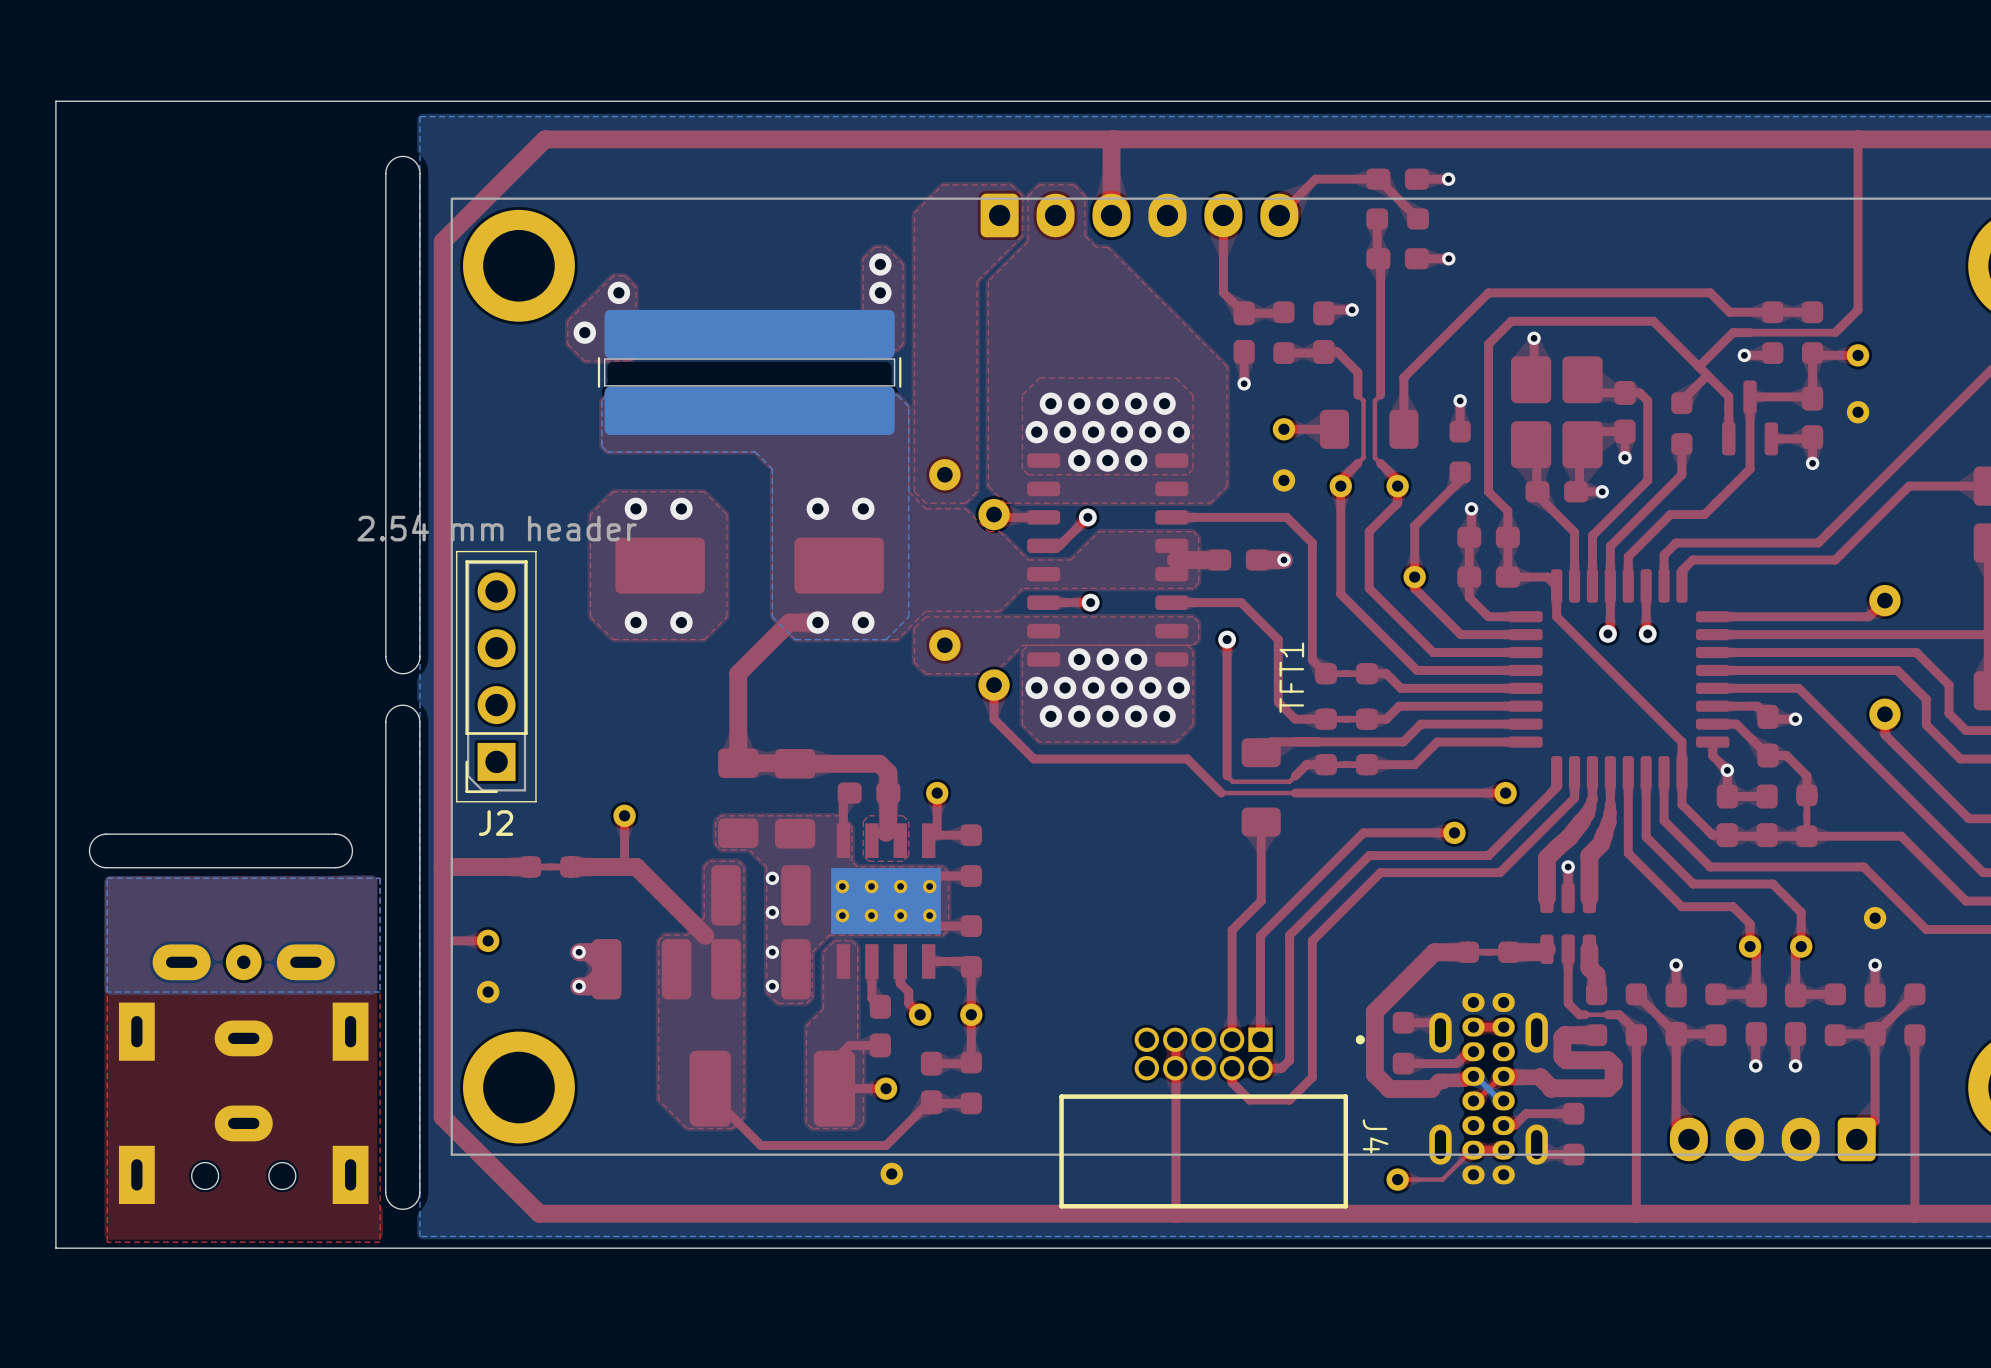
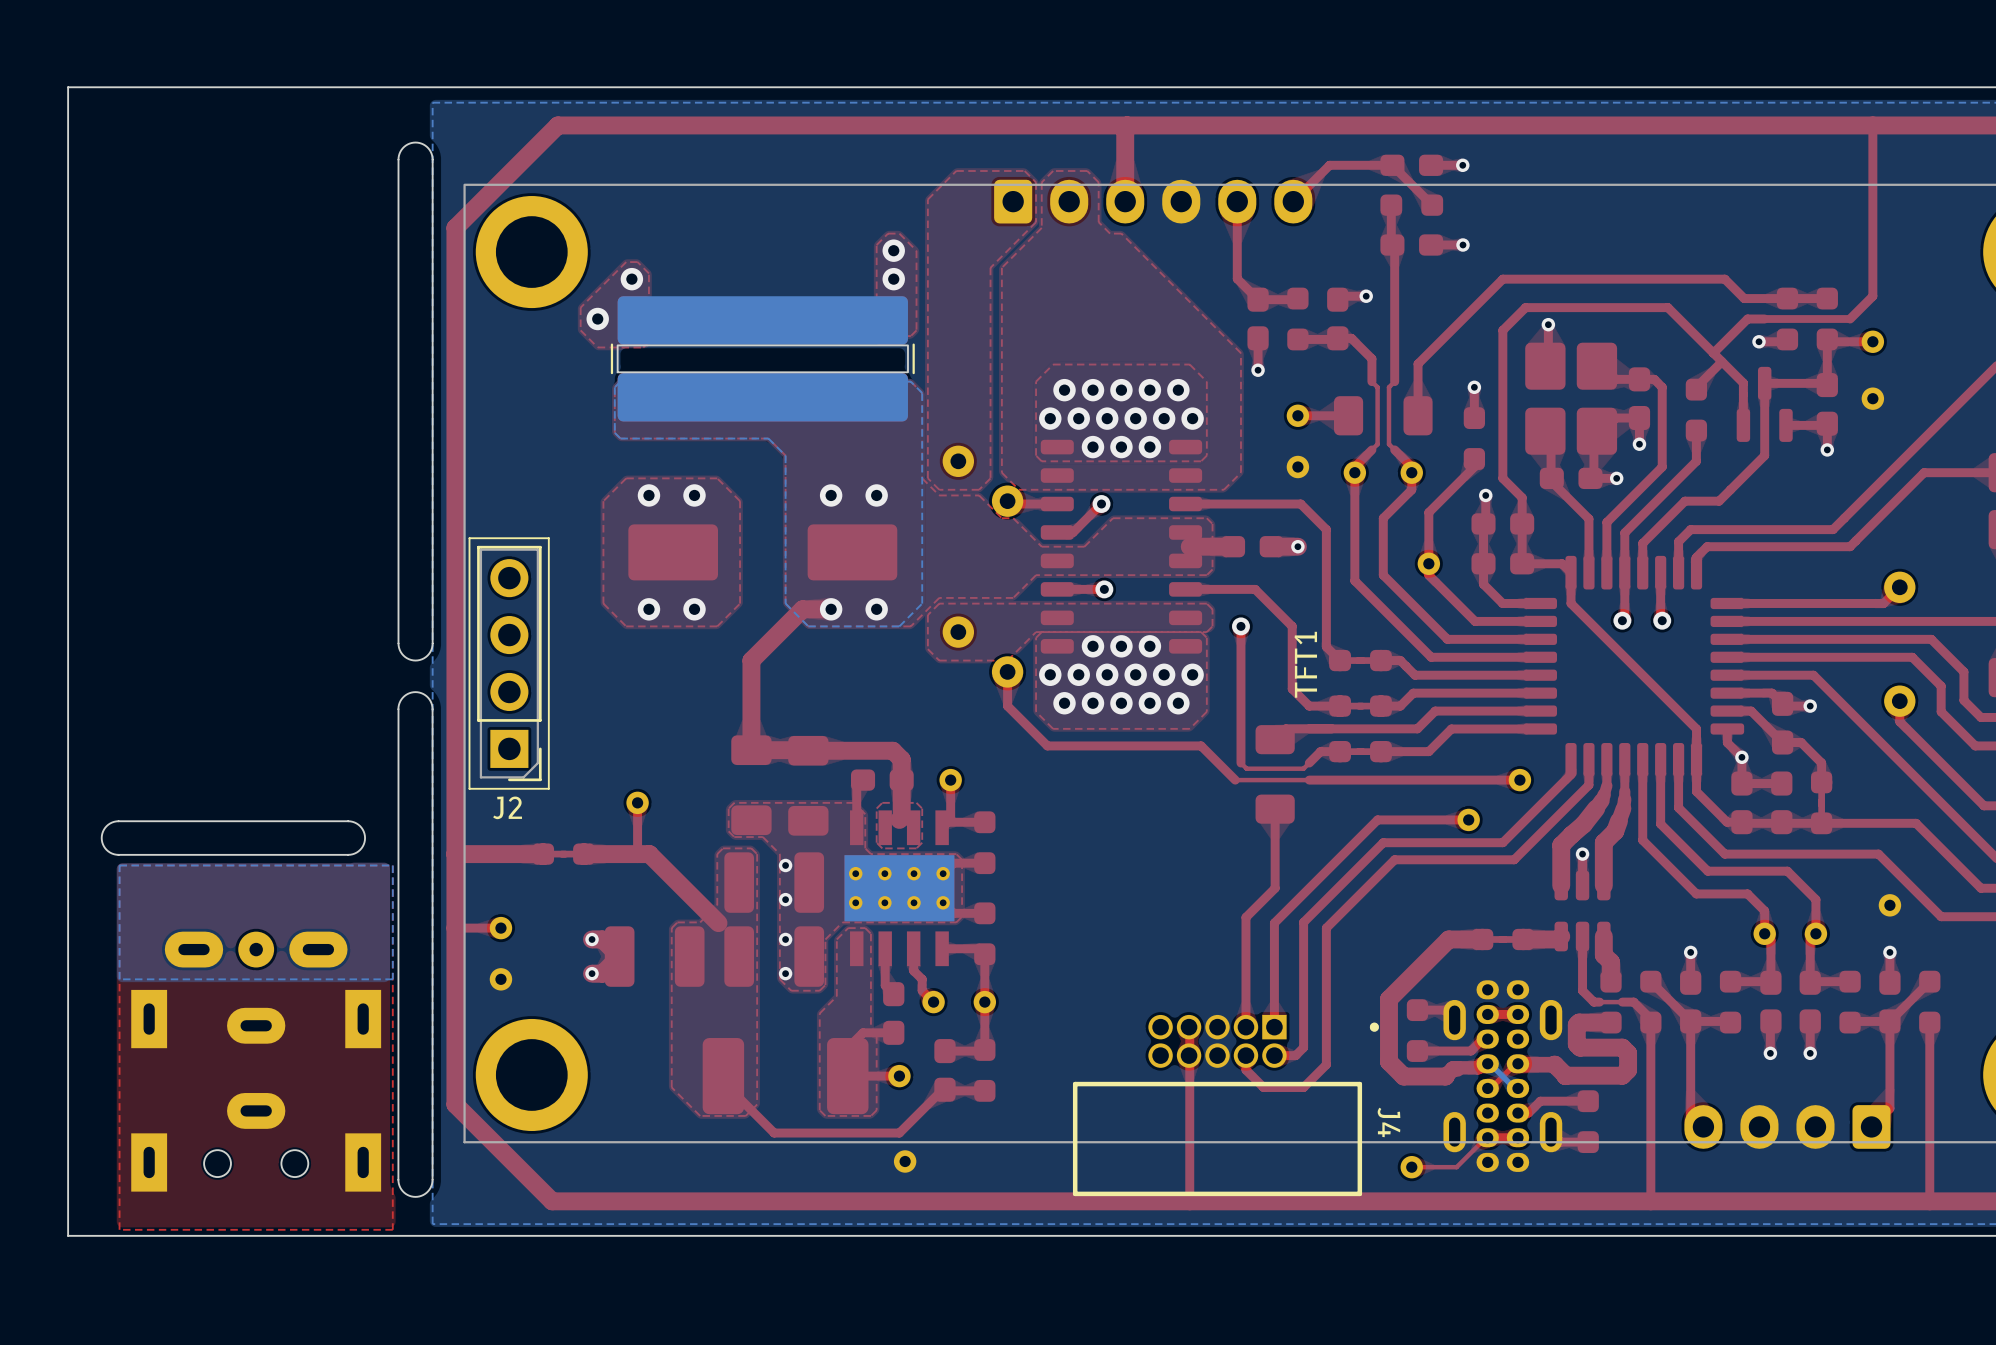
J2 value: 2.54 mm header (497, 528) -> none
J2 footprint: [465, 560, 528, 794] -> [477, 545, 542, 782]

